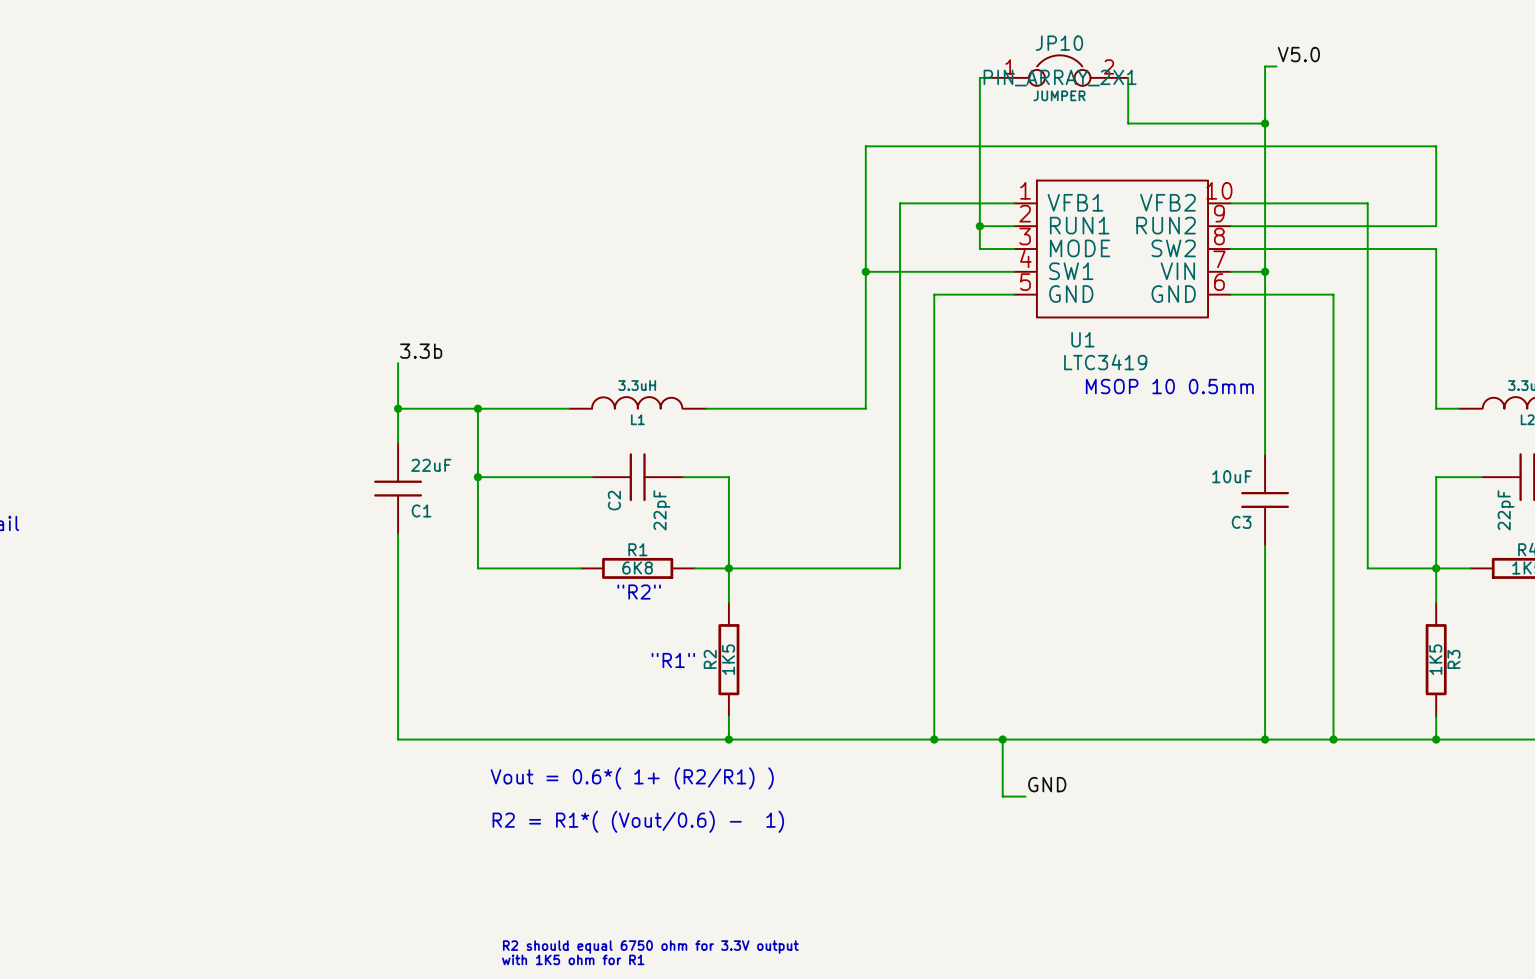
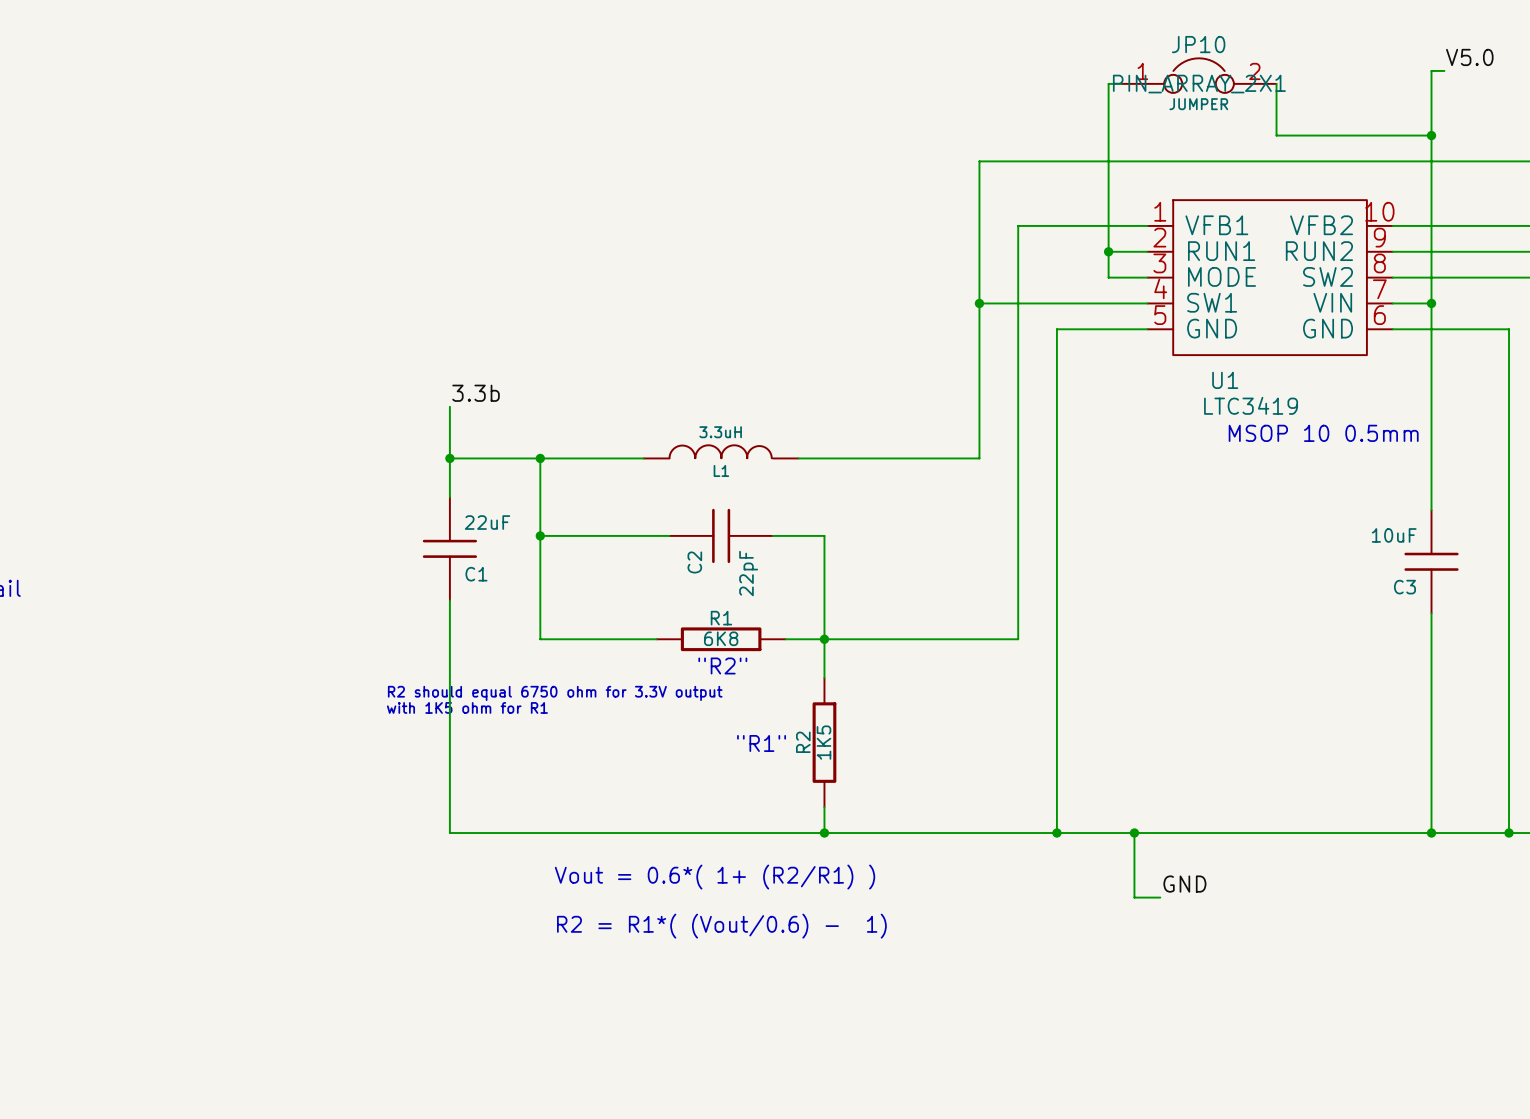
text: none -> R2 should equal 6750 ohm for 3.3V output (555, 693)
text: none -> with 1K5 ohm for R1 (467, 707)
text: R2 should equal 6750 ohm for 3.3V output (650, 947) -> none
text: with 1K5 ohm for R1 (573, 959) -> none

